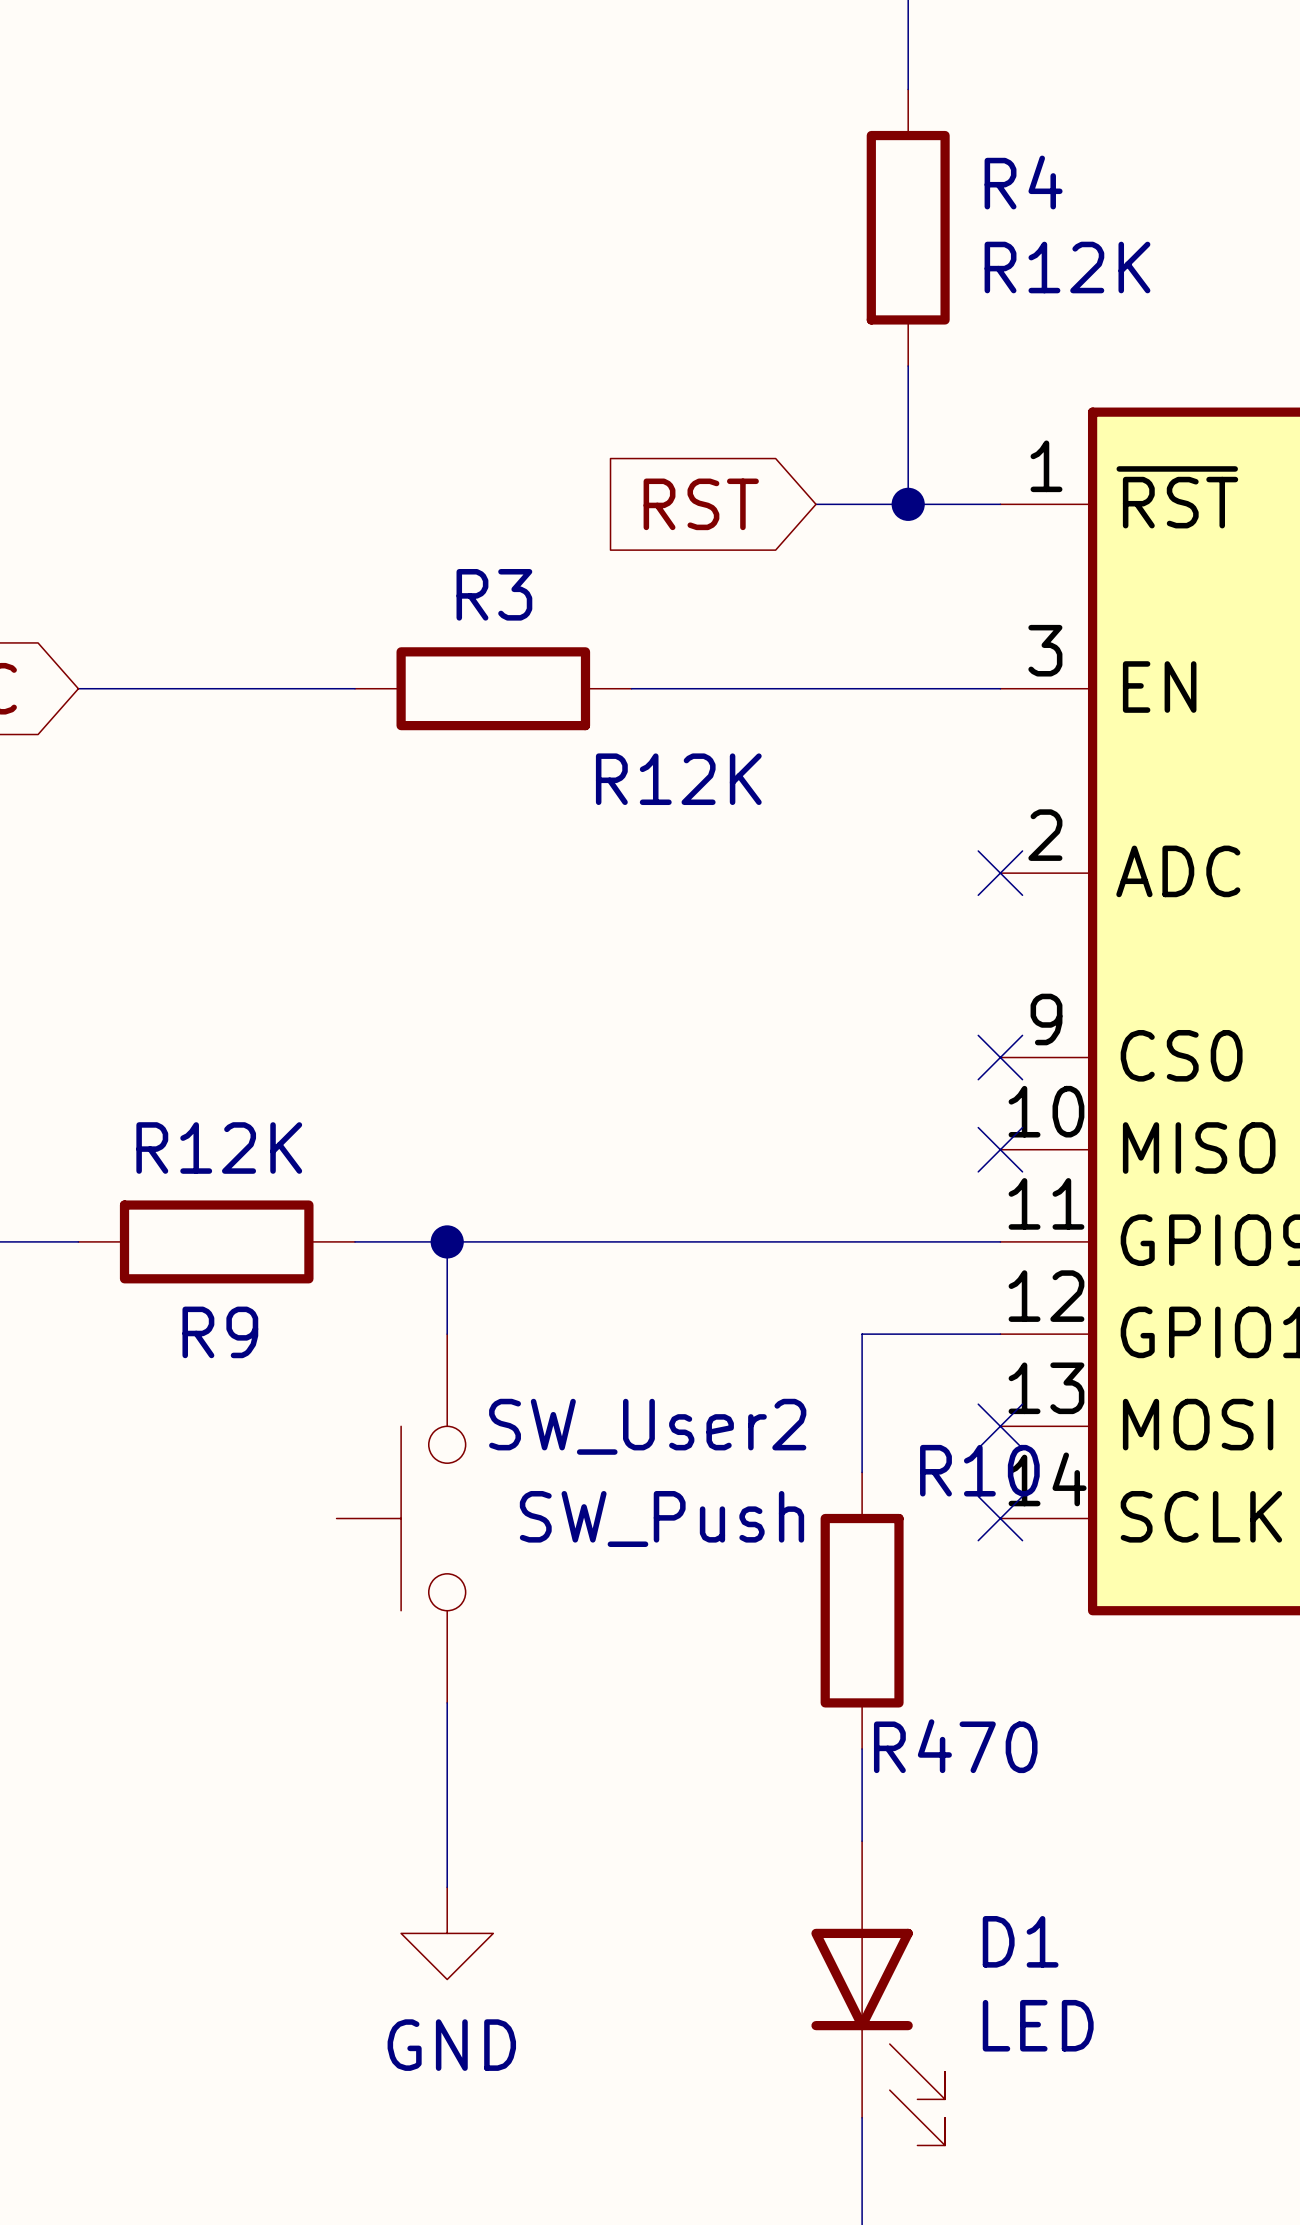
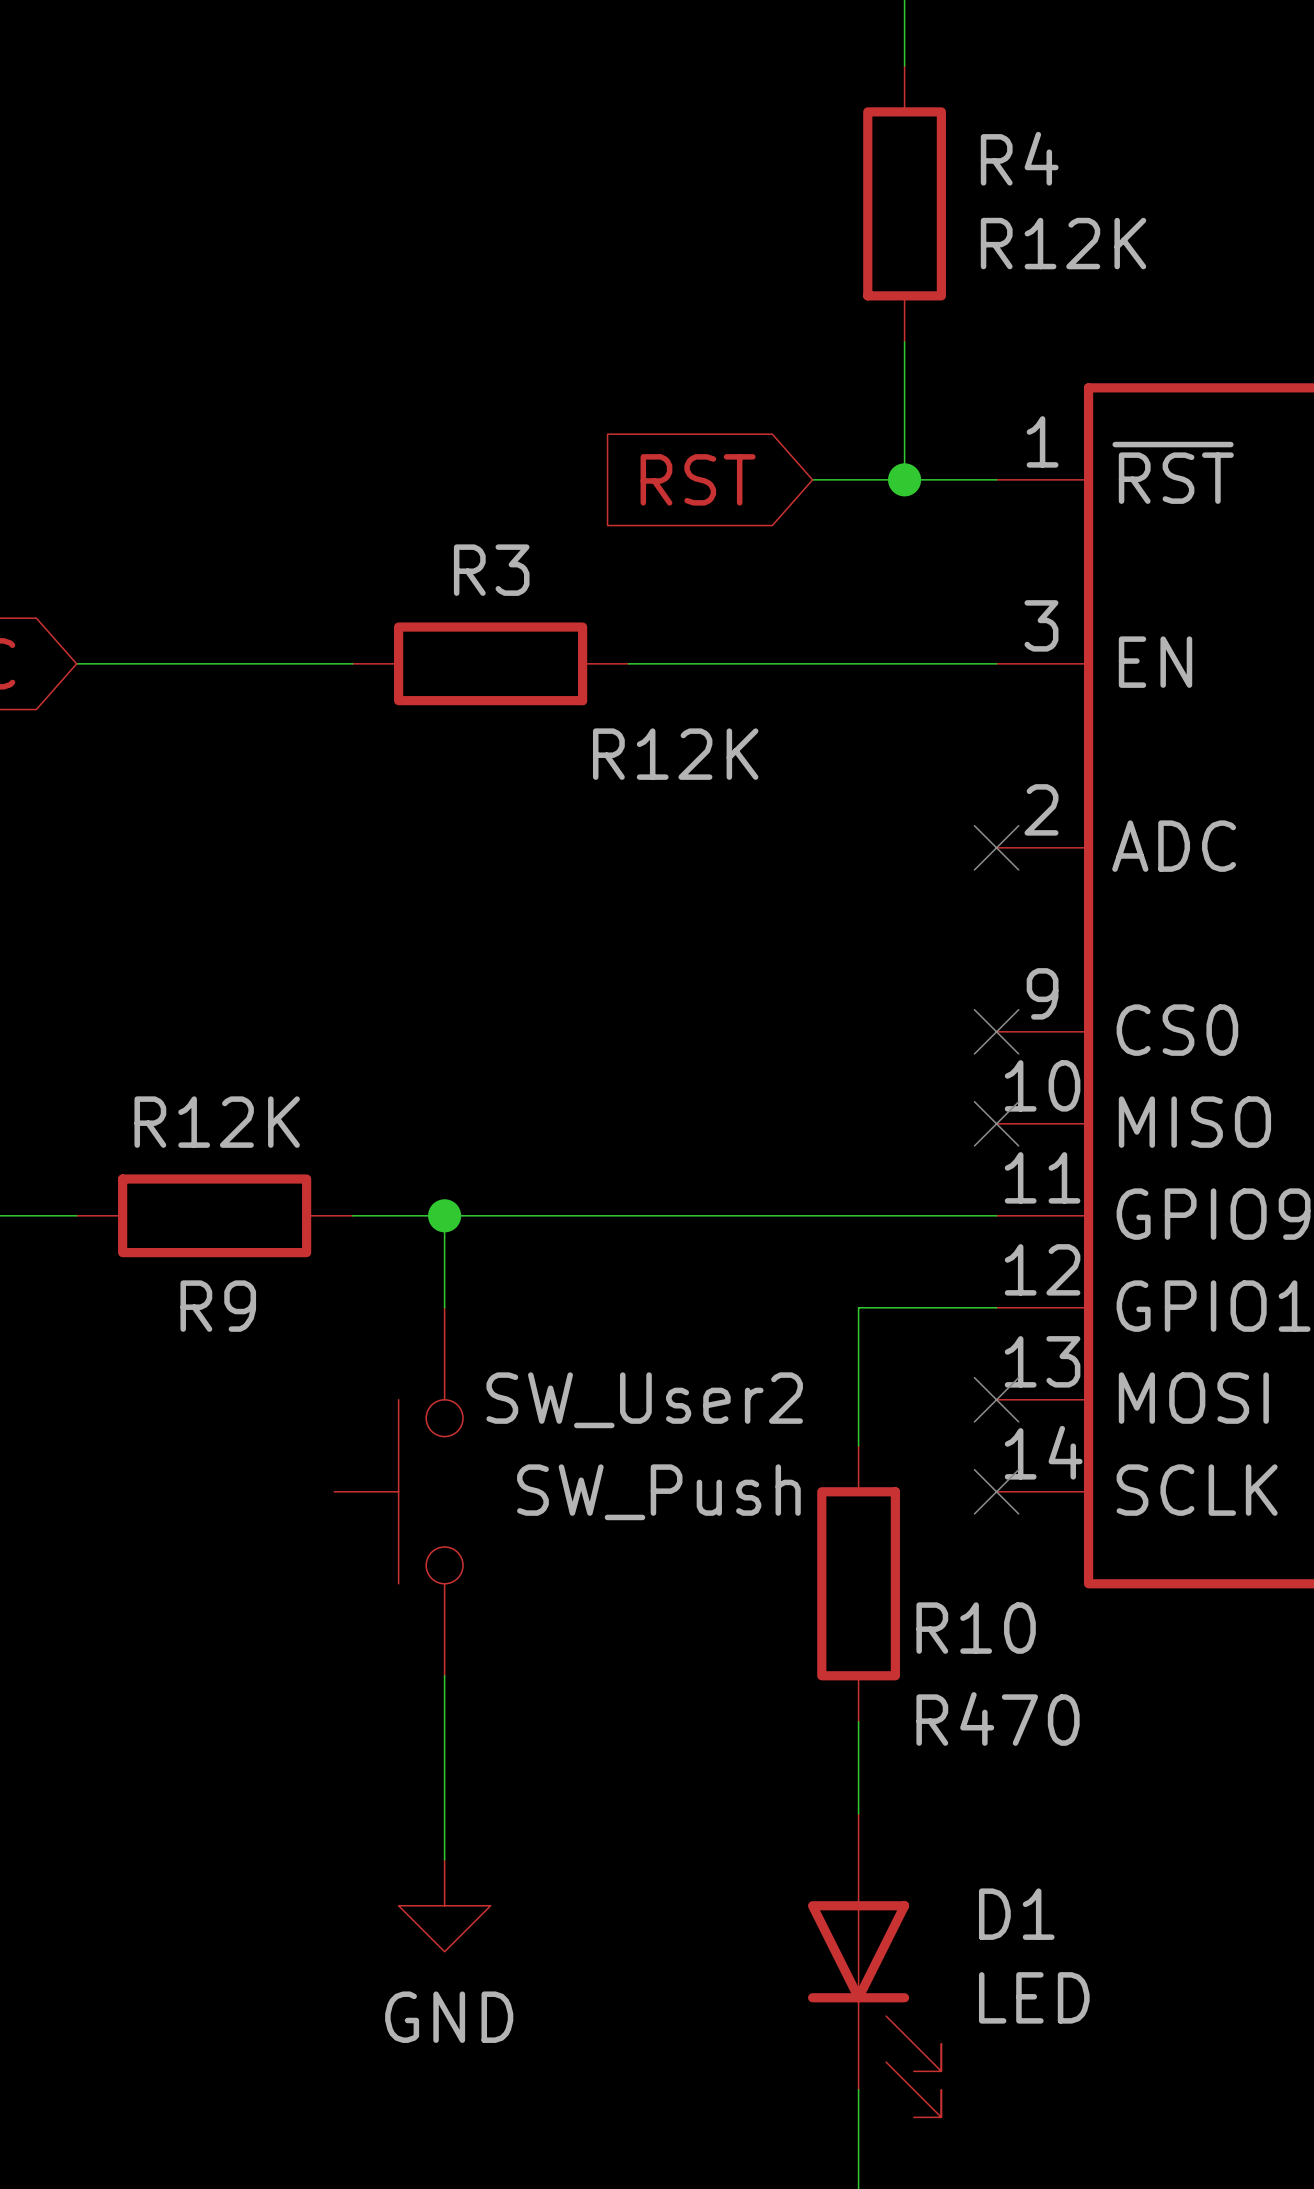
R10 name position: R10 (979, 1470) -> R10 (976, 1628)
R10 value position: R470 (955, 1746) -> R470 (998, 1718)

